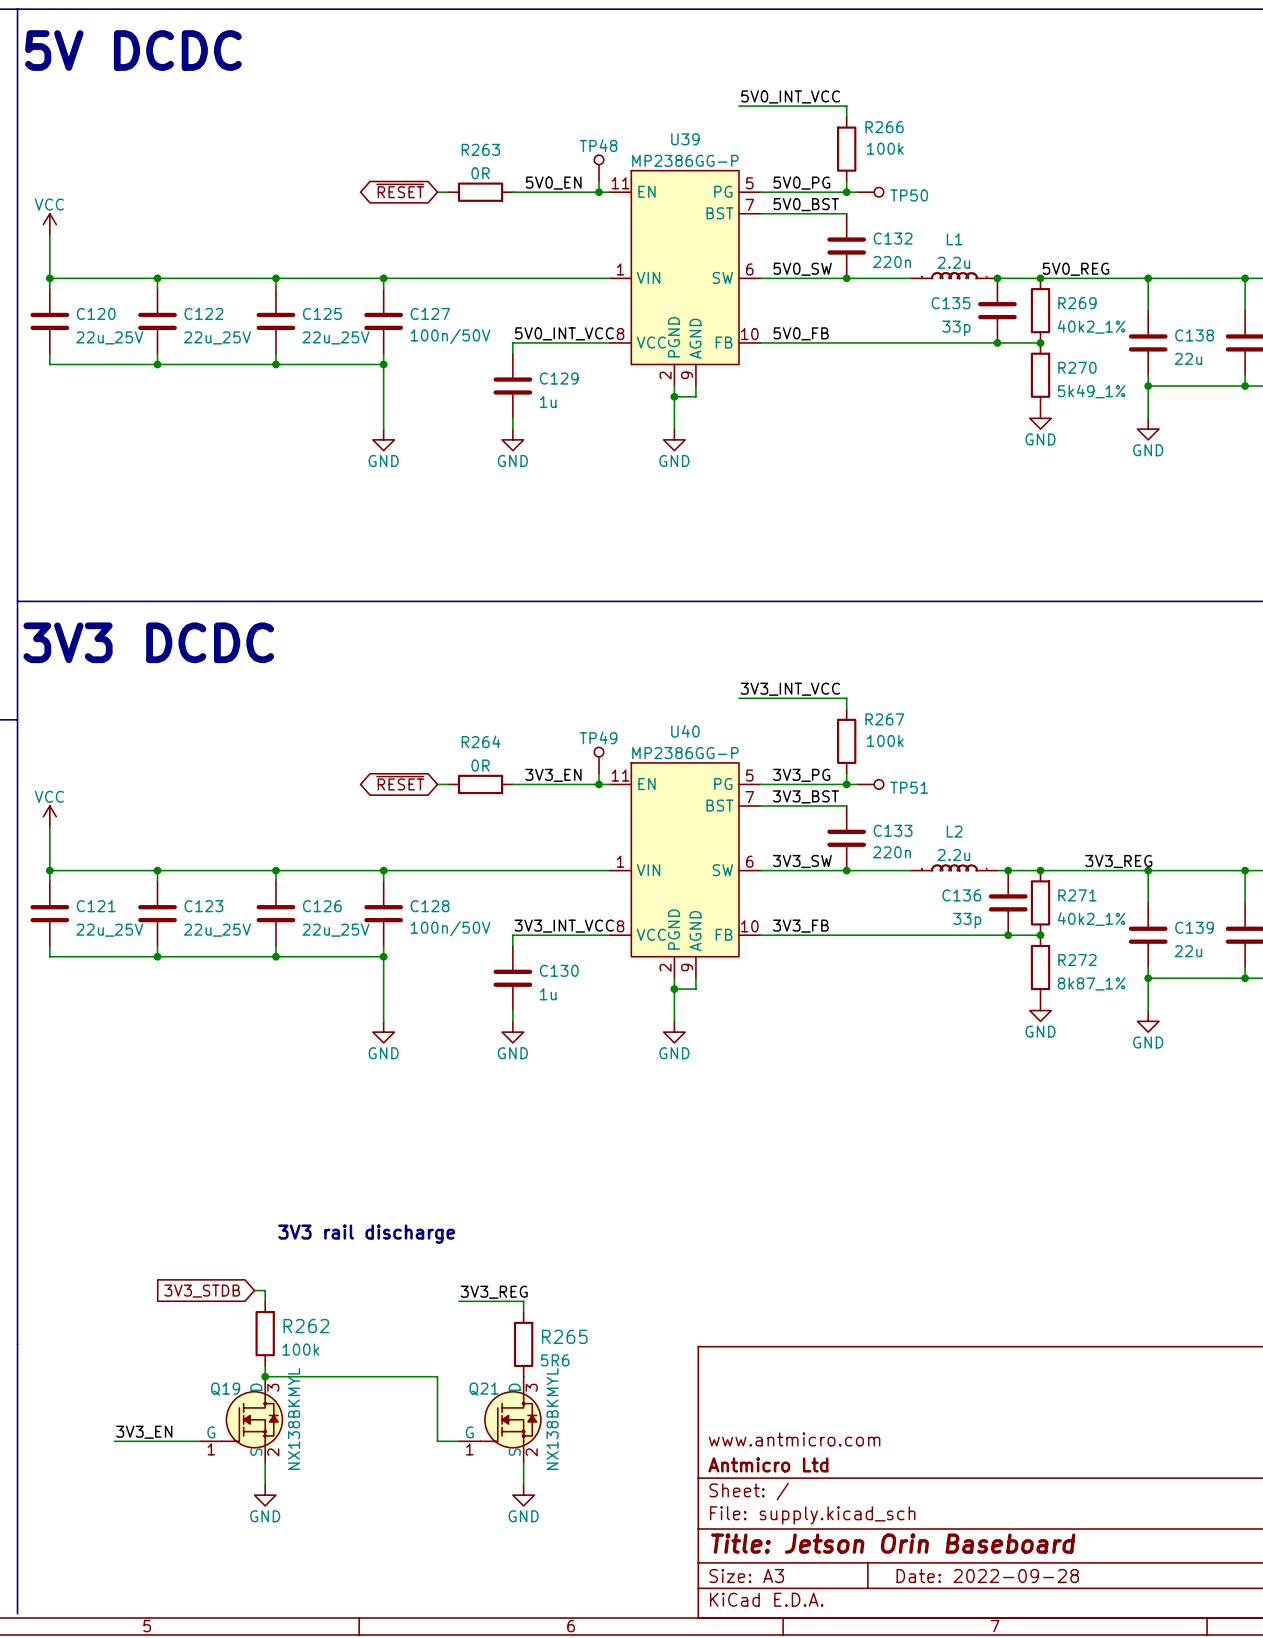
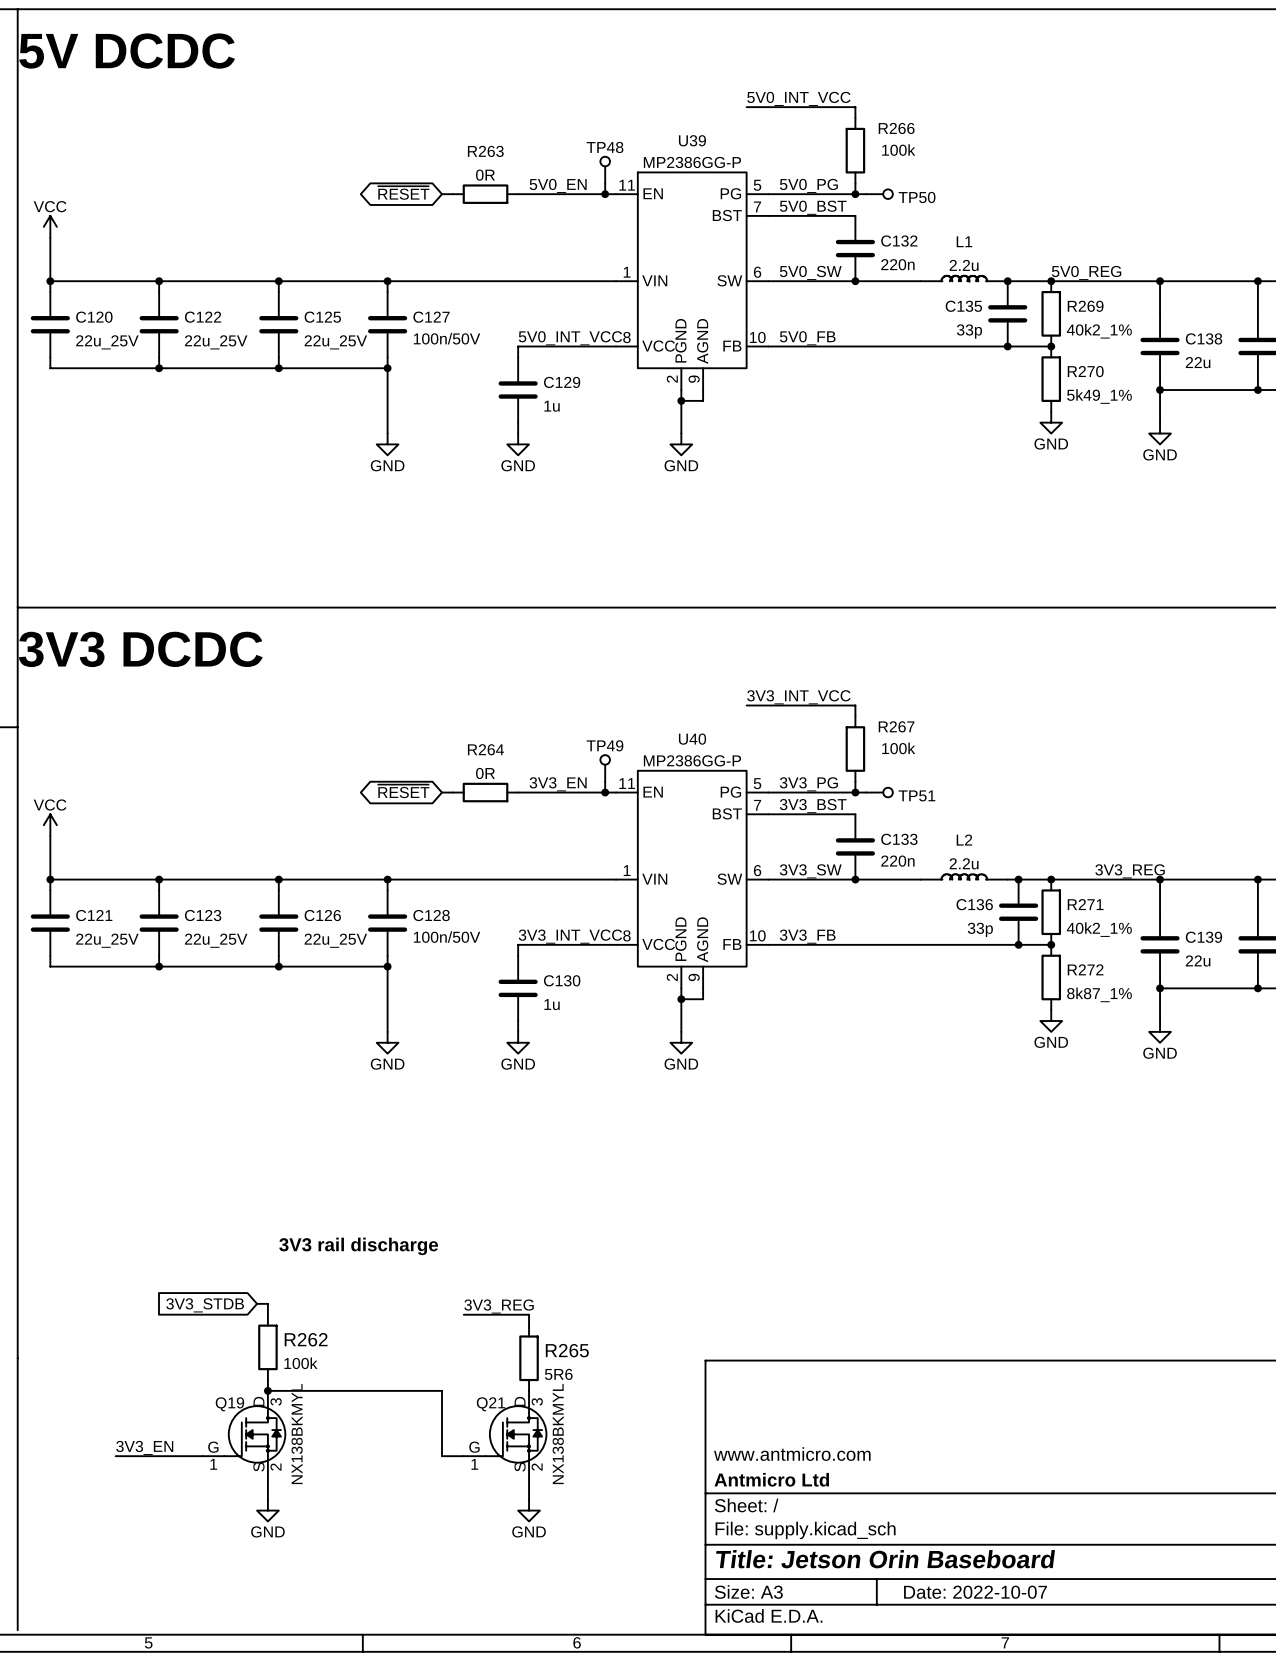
title block: Date: 2022-09-28 (987, 1576) -> Date: 2022-10-07 (975, 1592)

